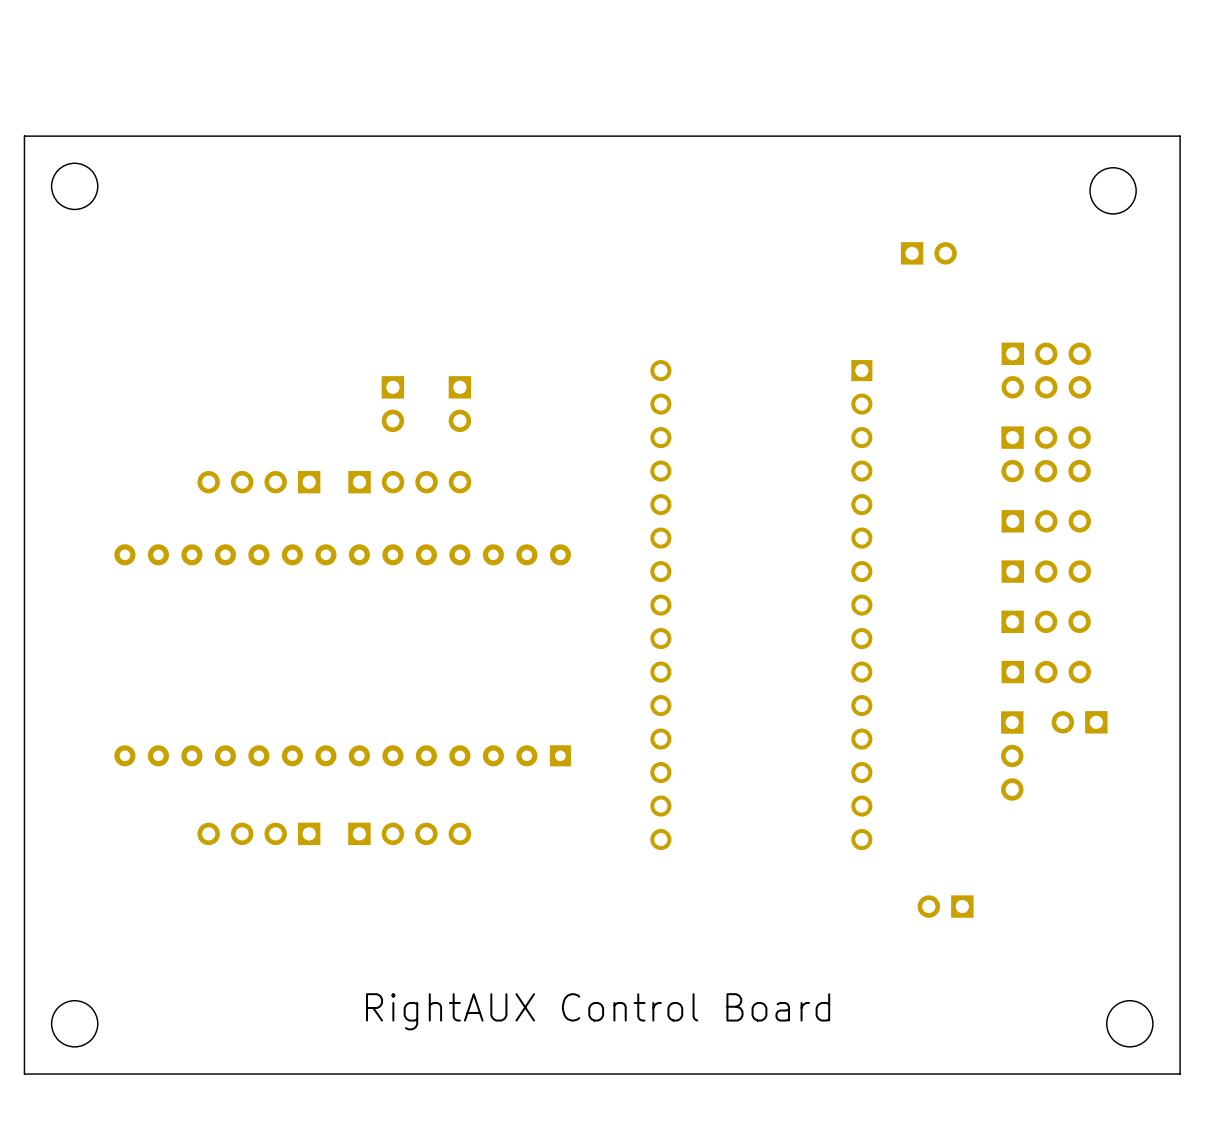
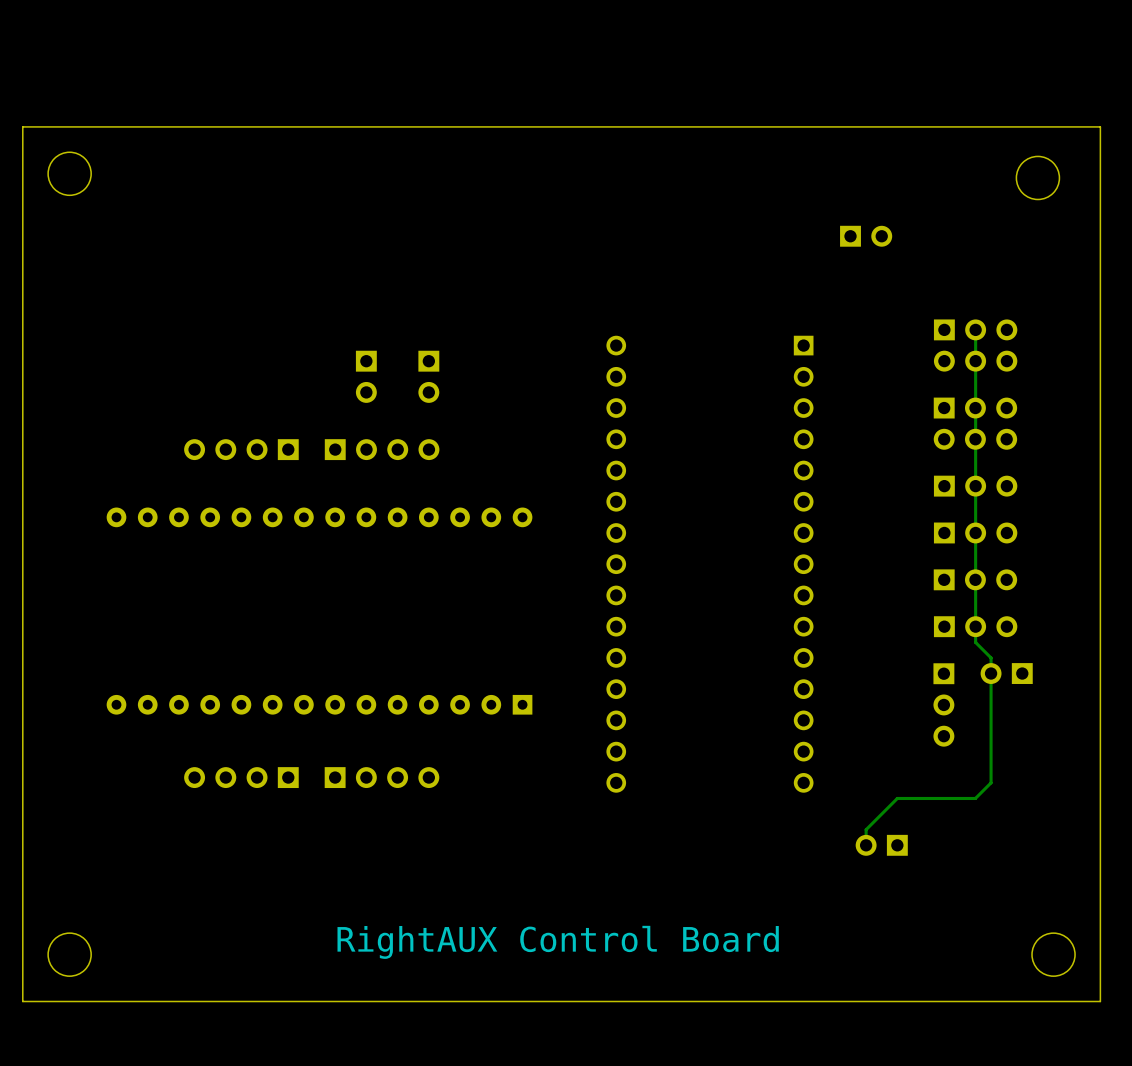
bottom track: none -> (975, 329) (975, 642) (991, 657) (991, 782) (975, 798) (897, 798) (866, 829) (866, 845)

